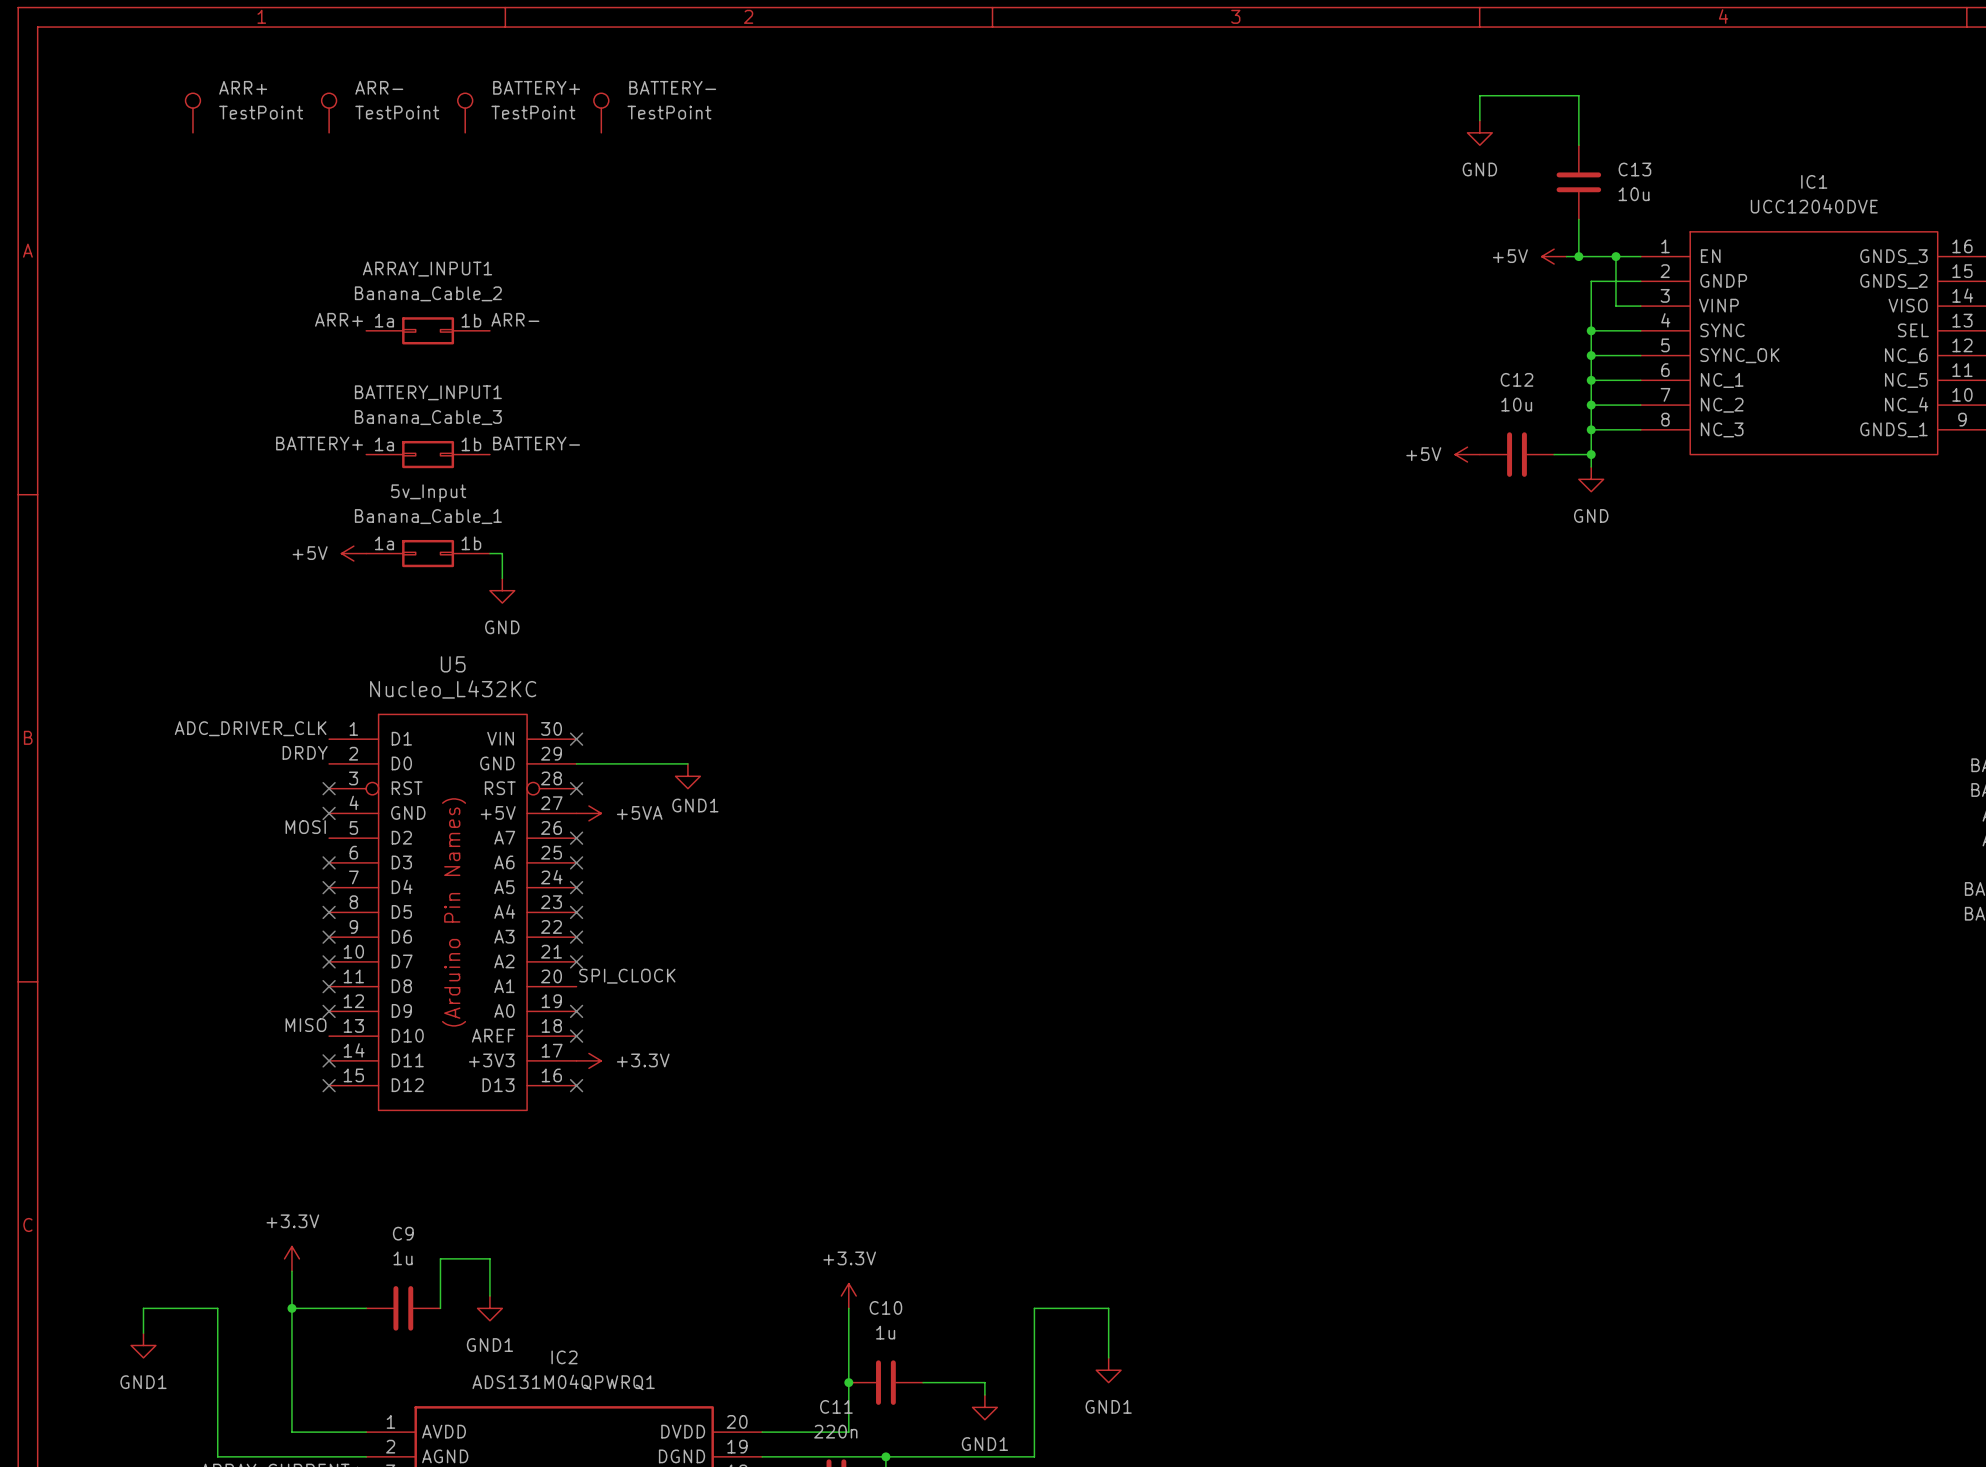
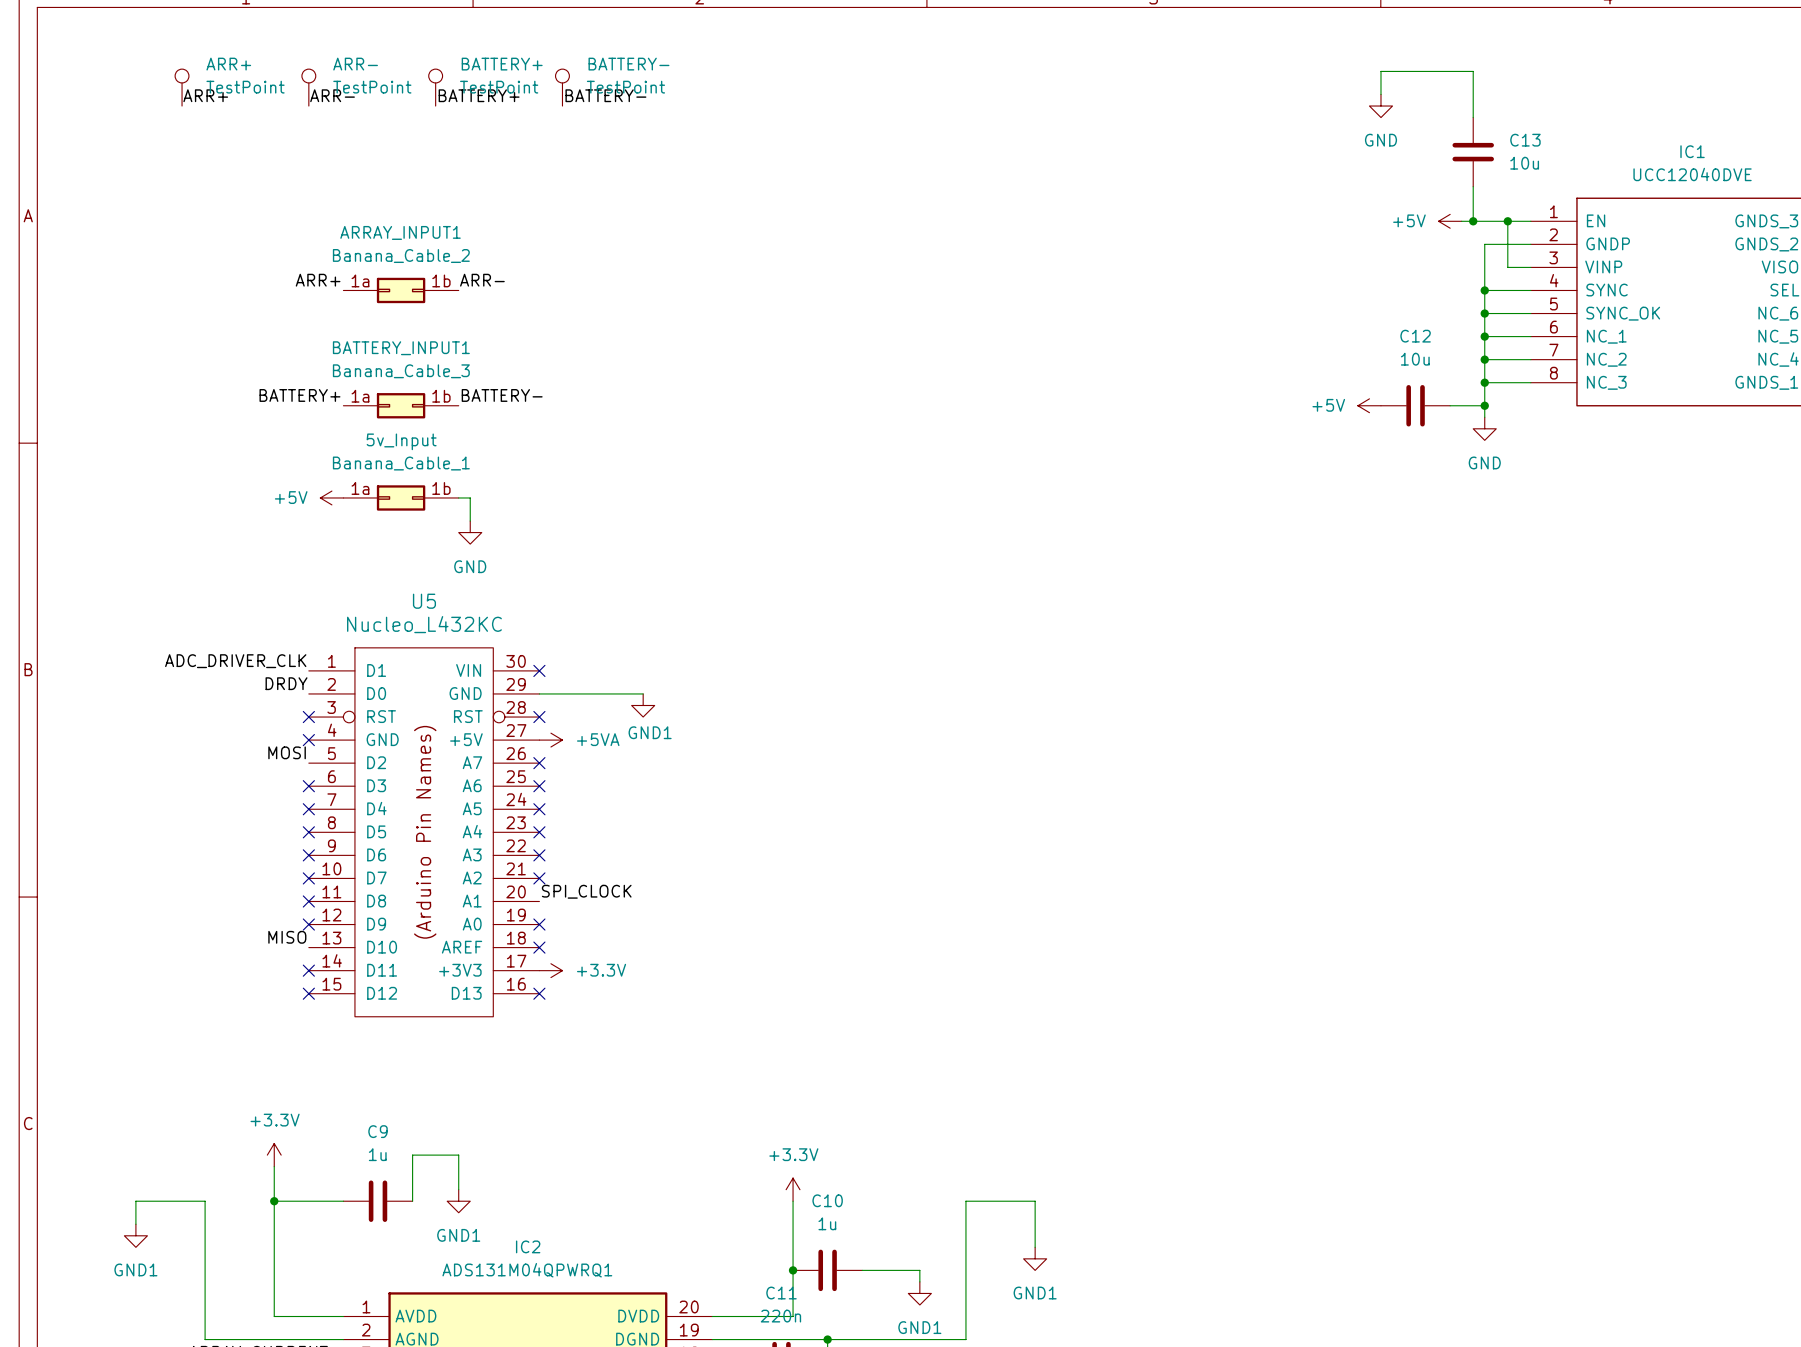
label: none -> ARR+ (205, 95)
label: none -> ARR- (332, 95)
label: none -> BATTERY+ (479, 95)
label: none -> BATTERY- (605, 95)

